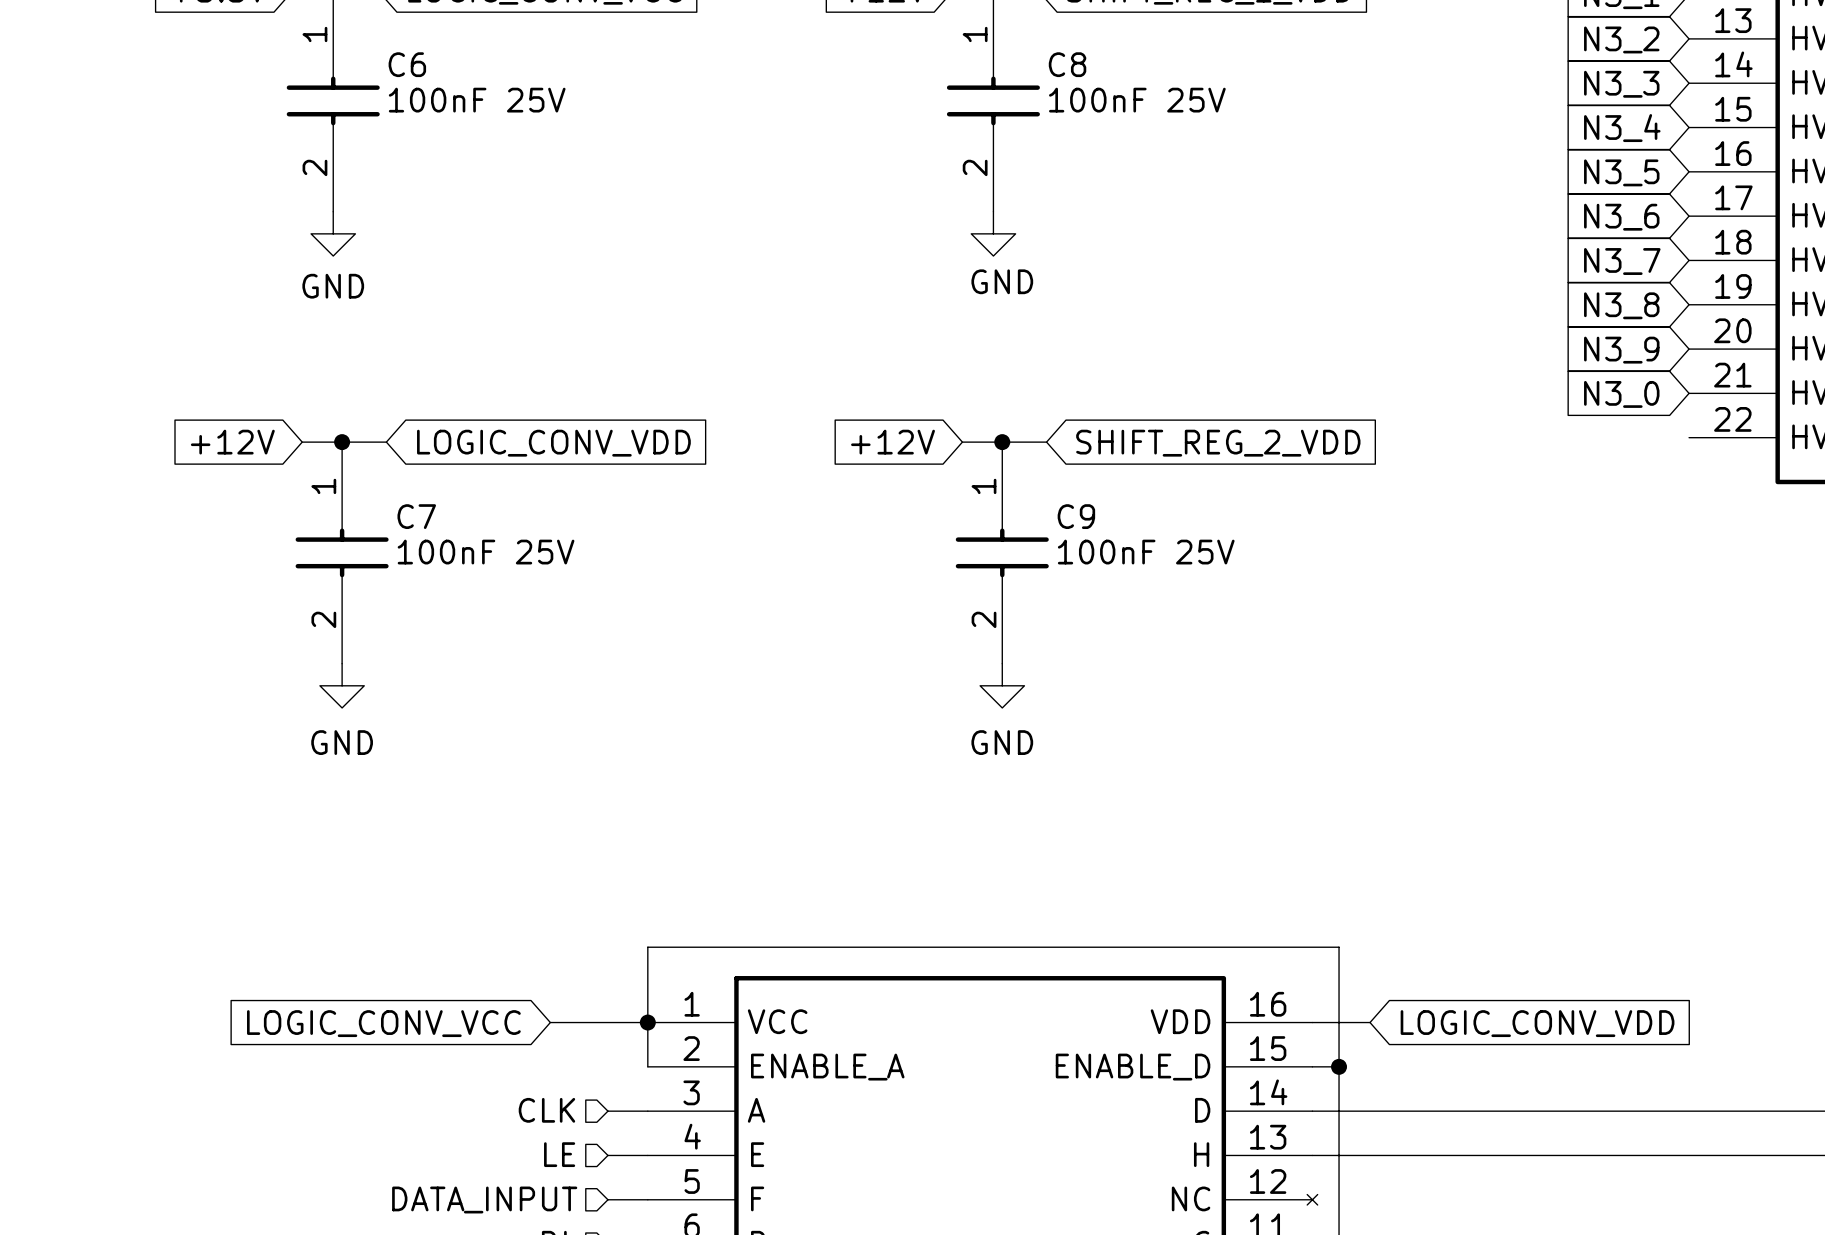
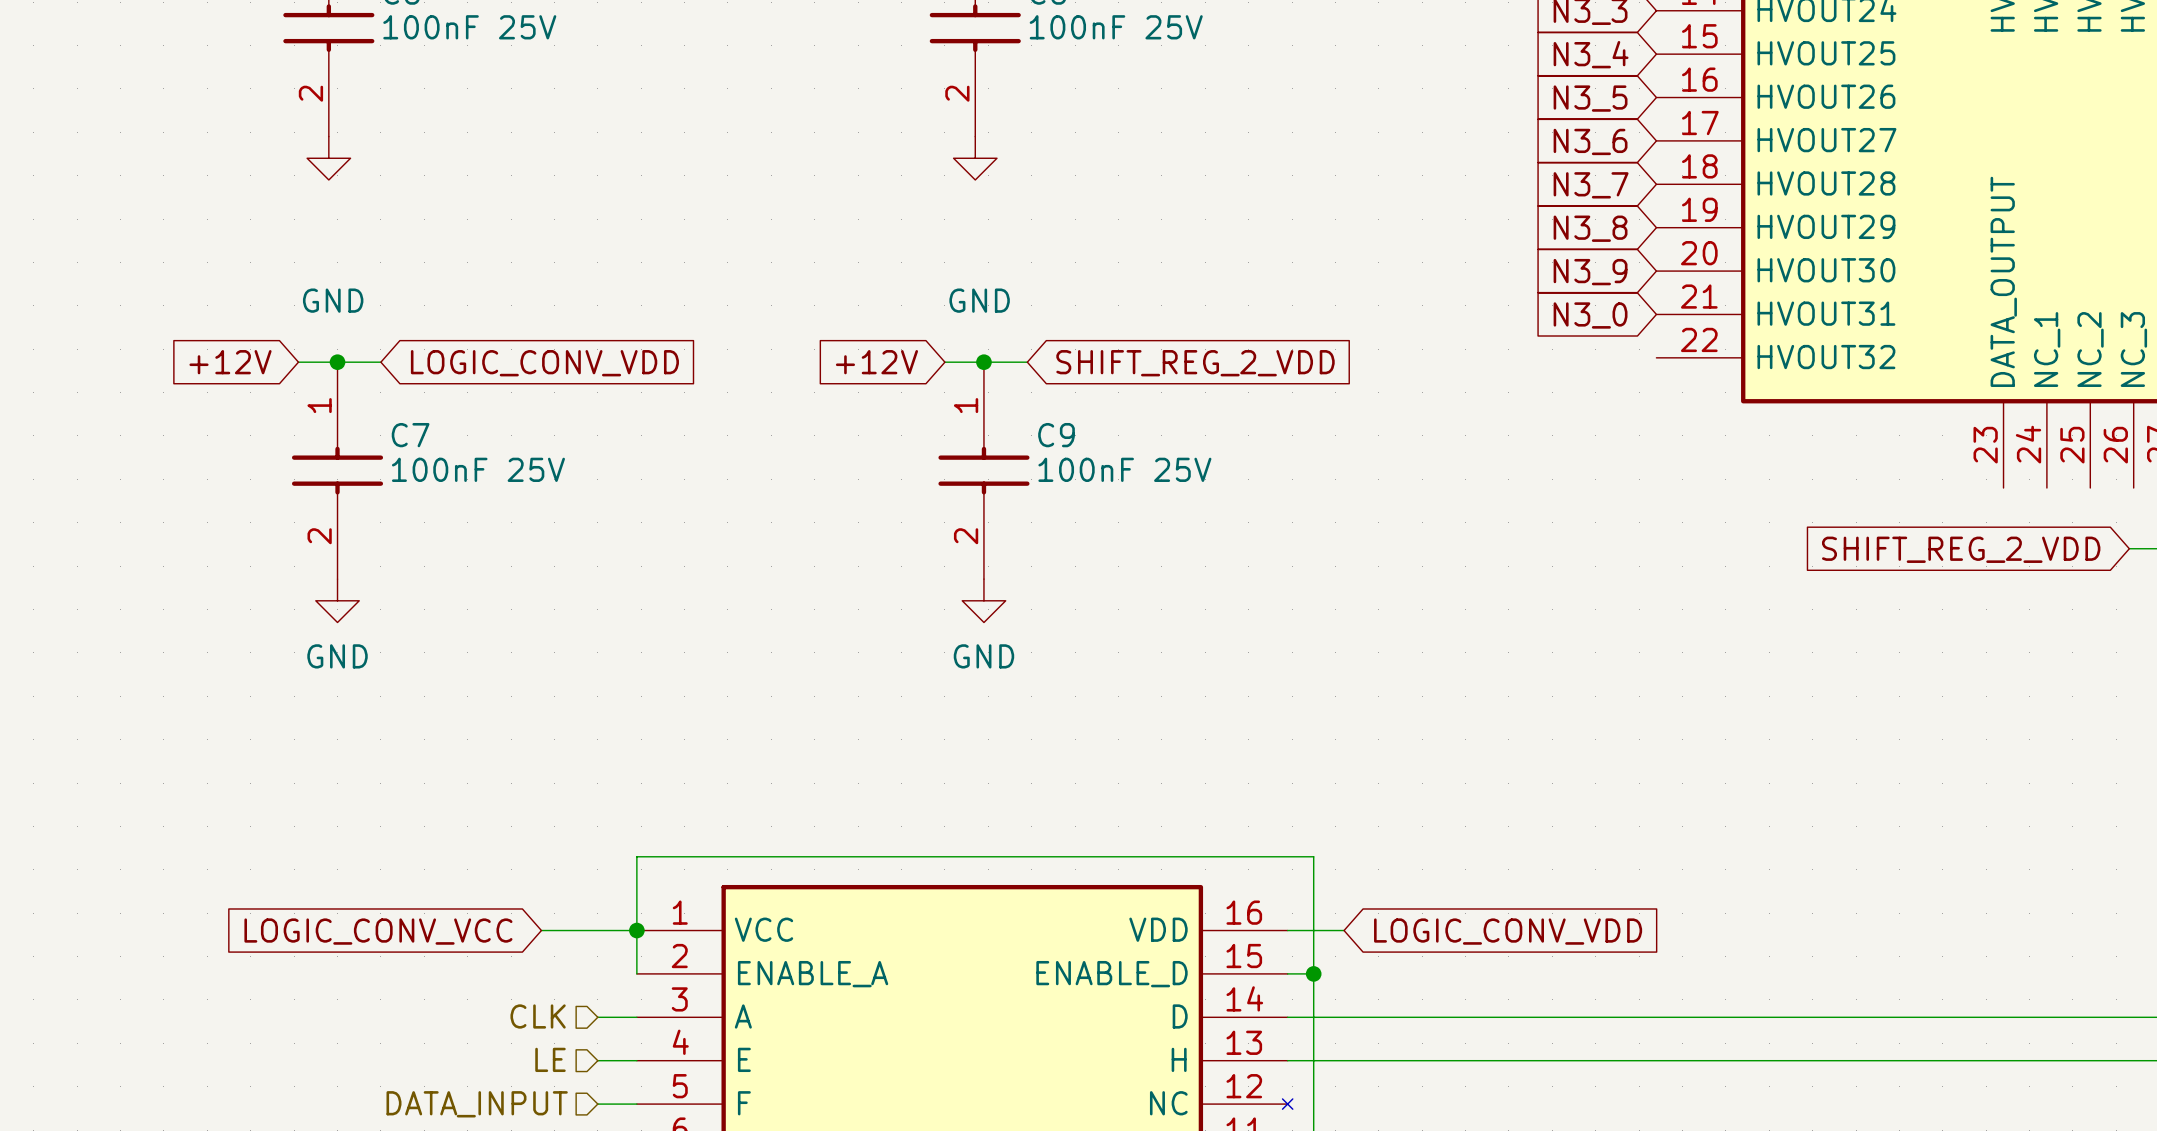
power symbol text position: GND (1002, 281) -> GND (979, 300)
power symbol text position: GND (333, 286) -> GND (333, 300)

